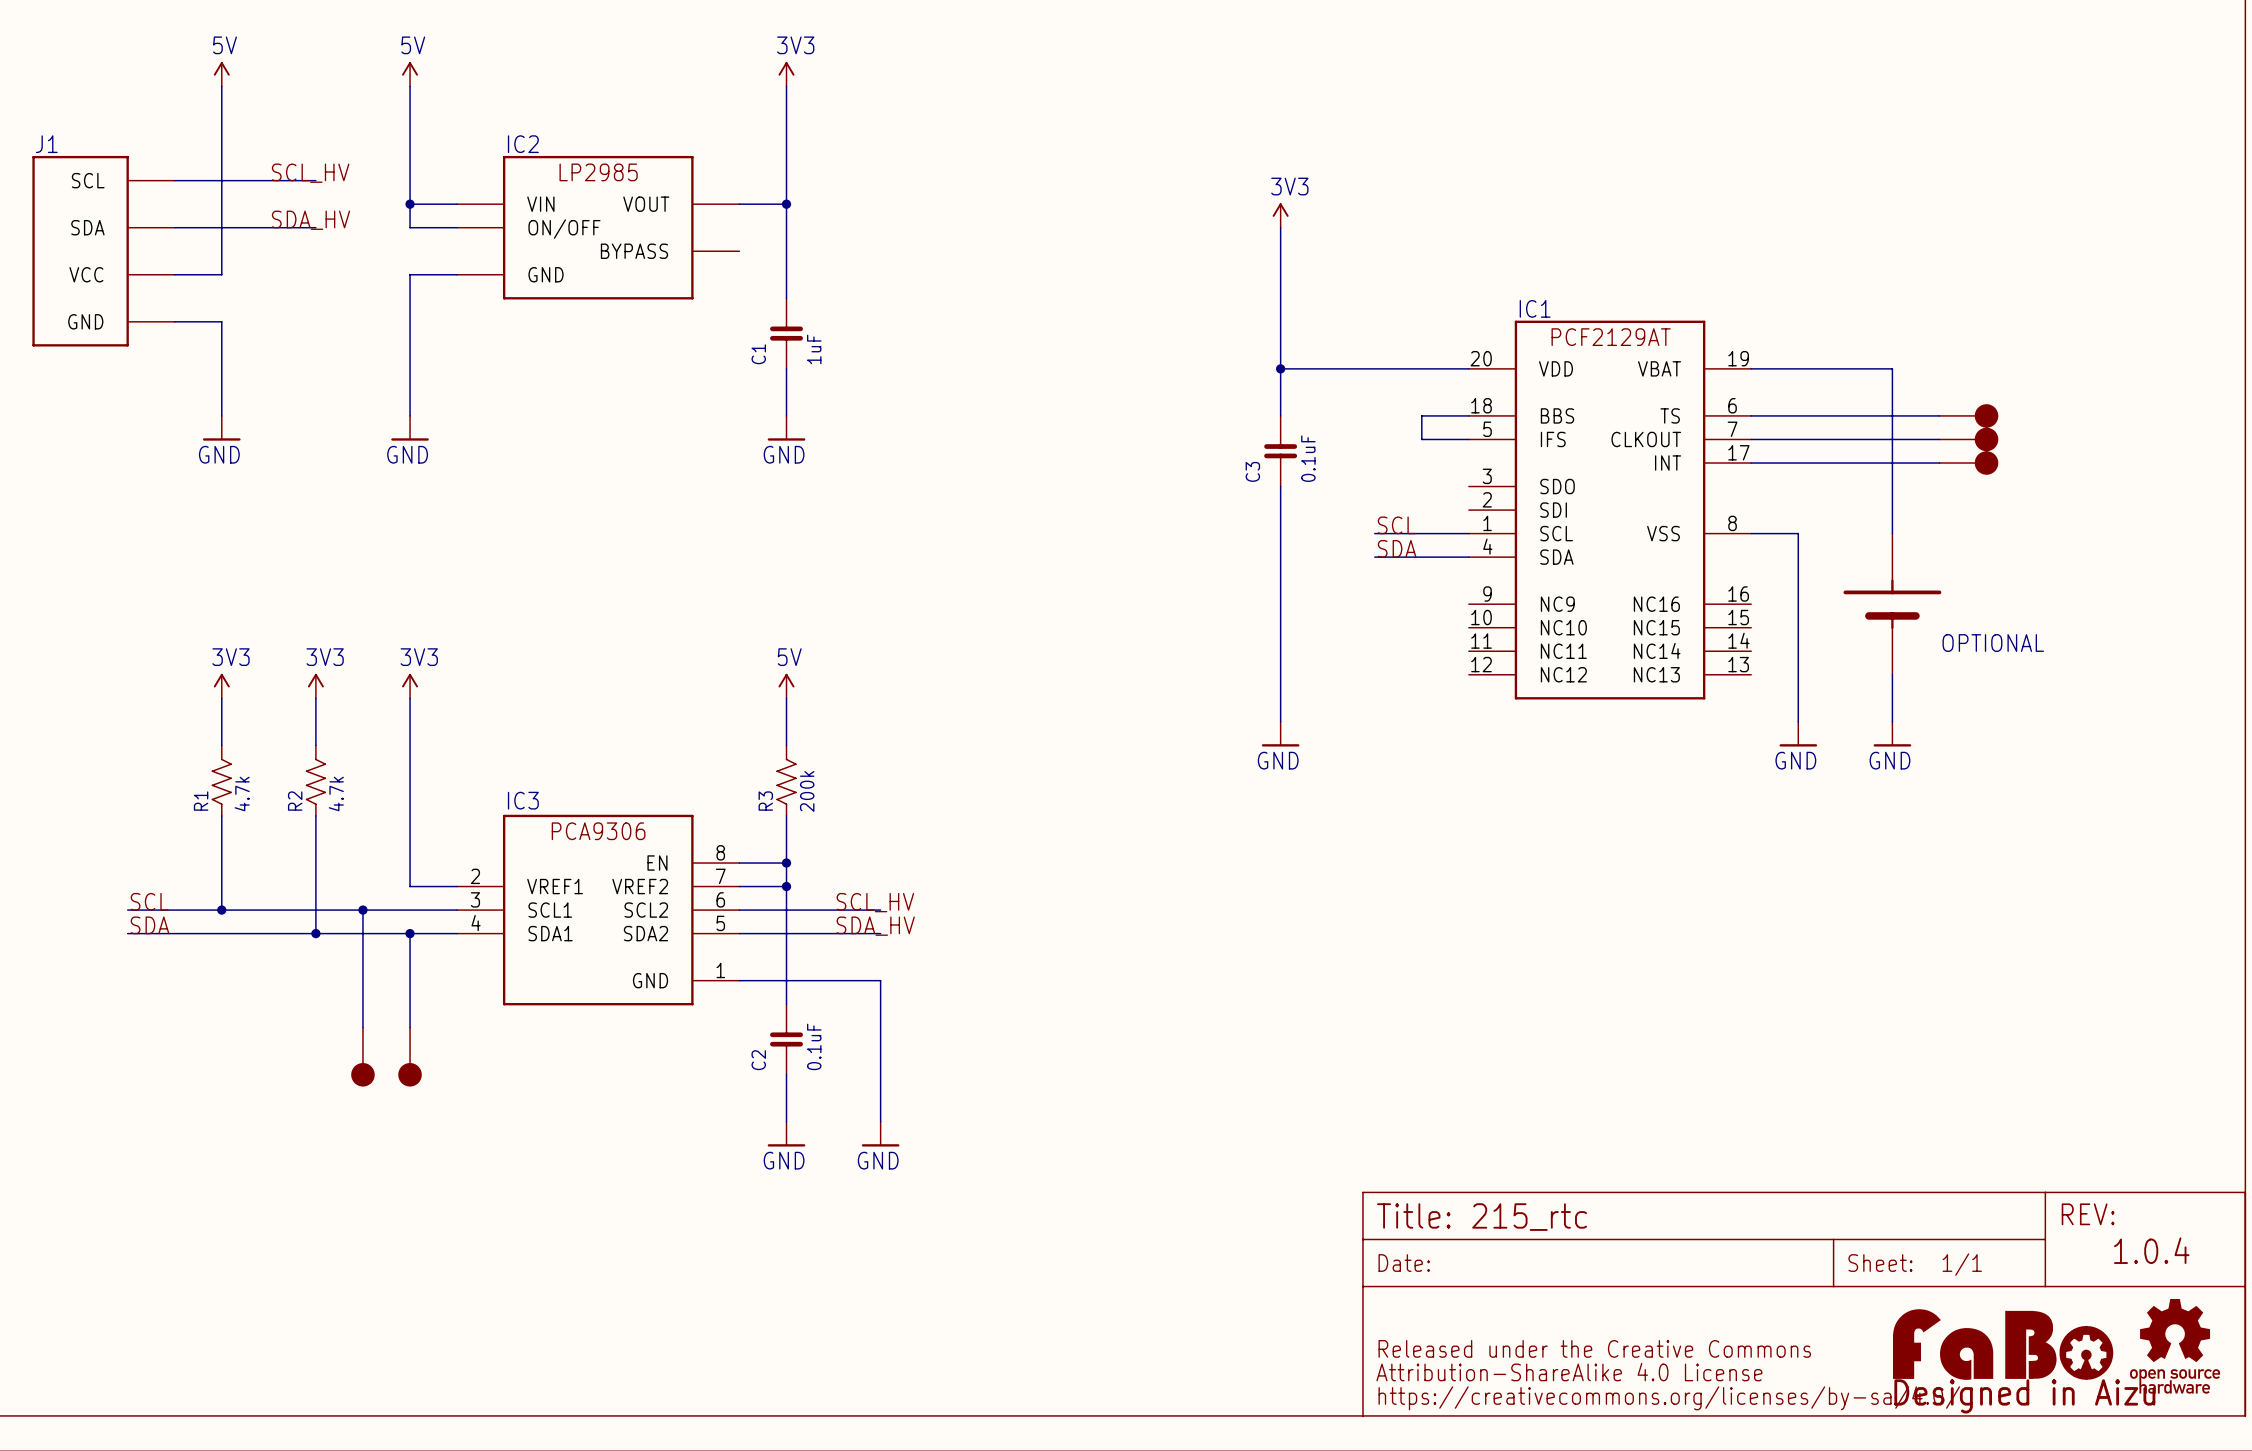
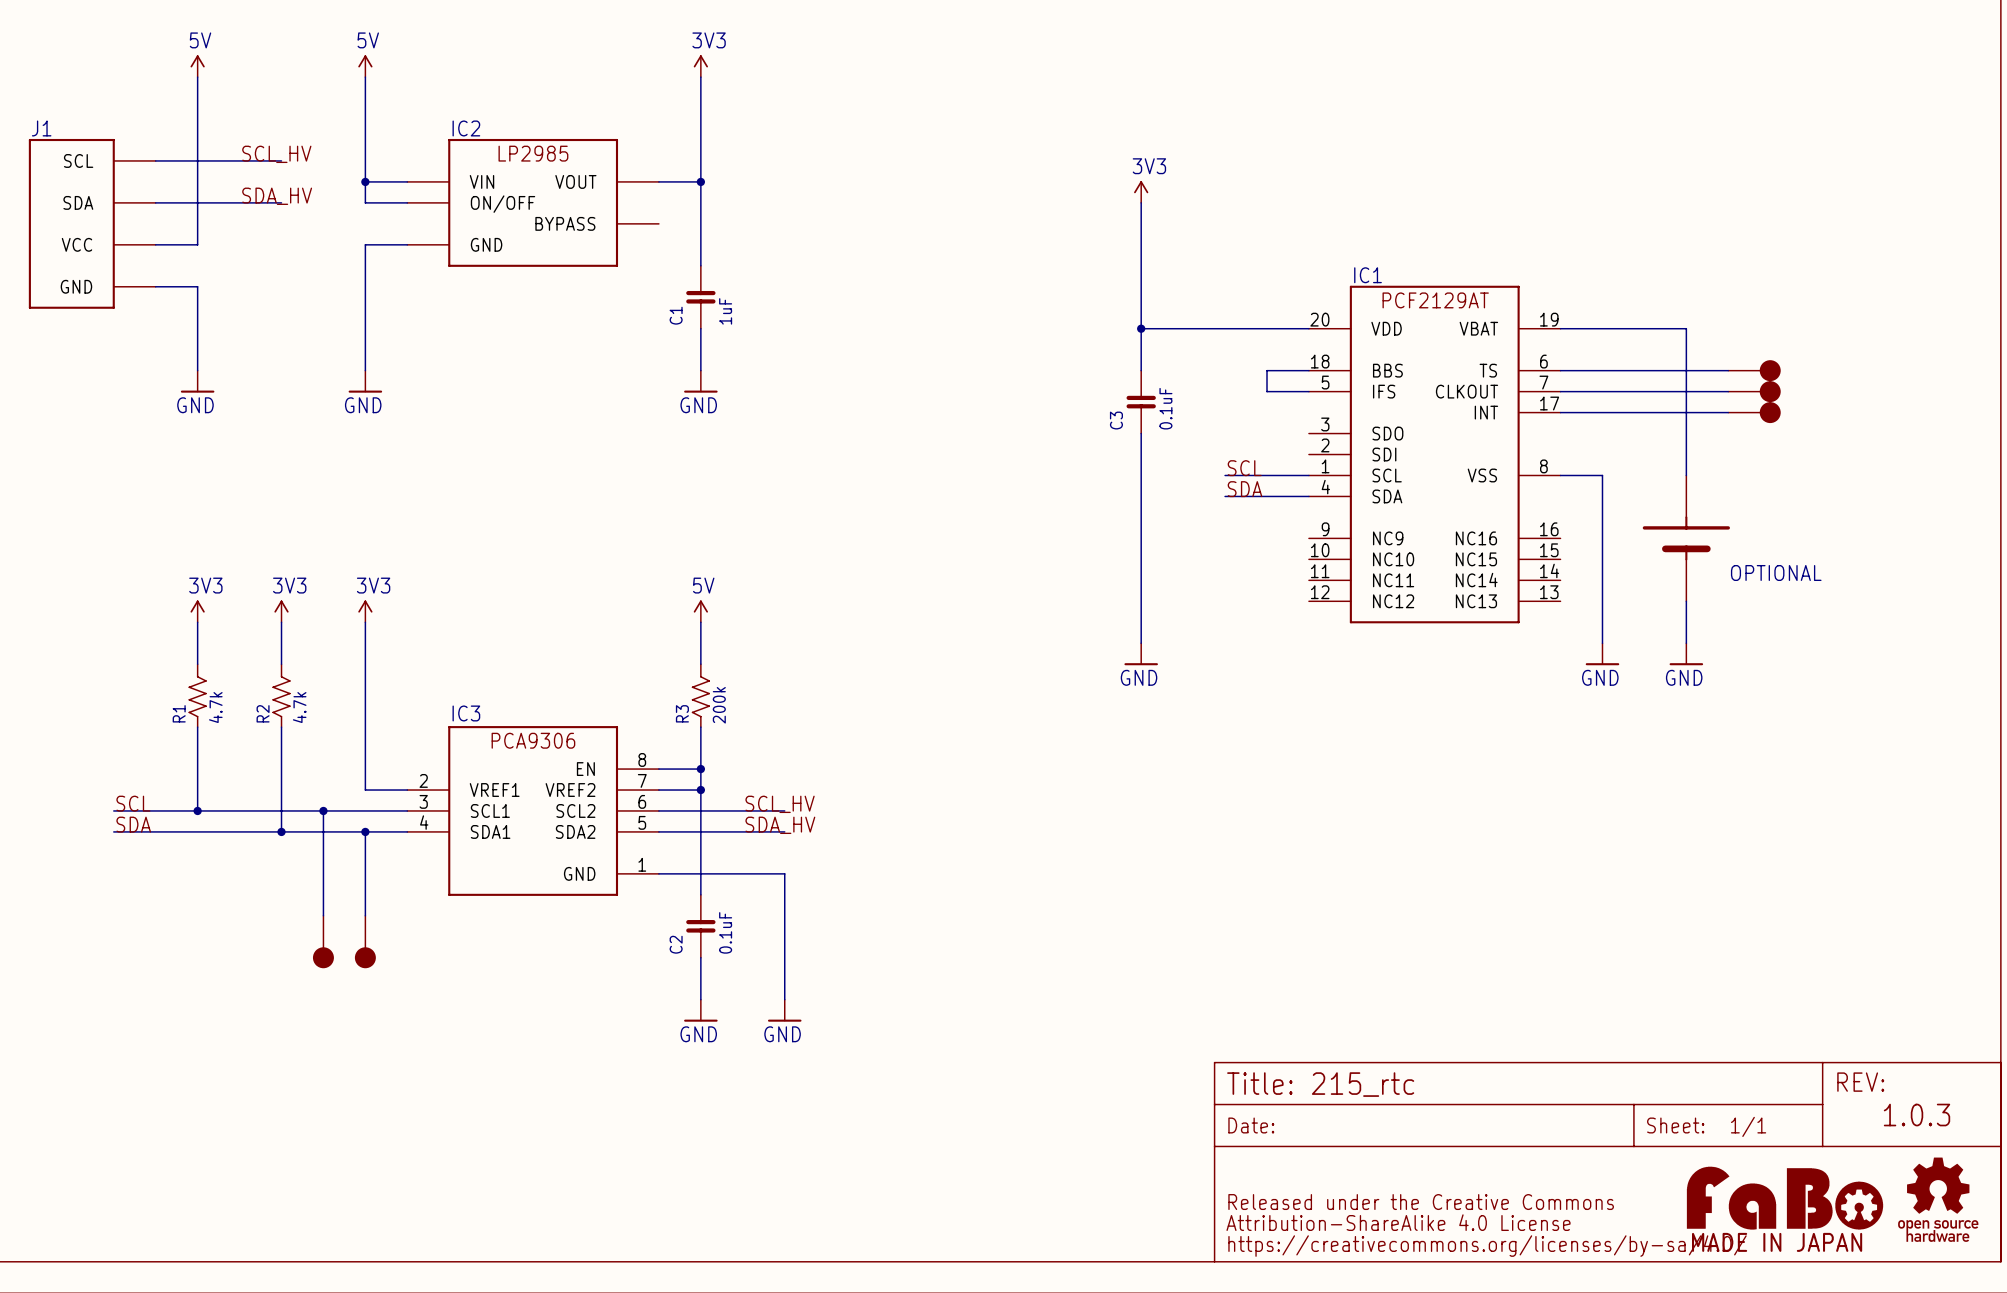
text: 1.0.4 (2151, 1250) -> 1.0.3 (1917, 1115)
part text: none -> MADE IN JAPAN (1777, 1242)
part text: Designed in Aizu (2024, 1396) -> none

